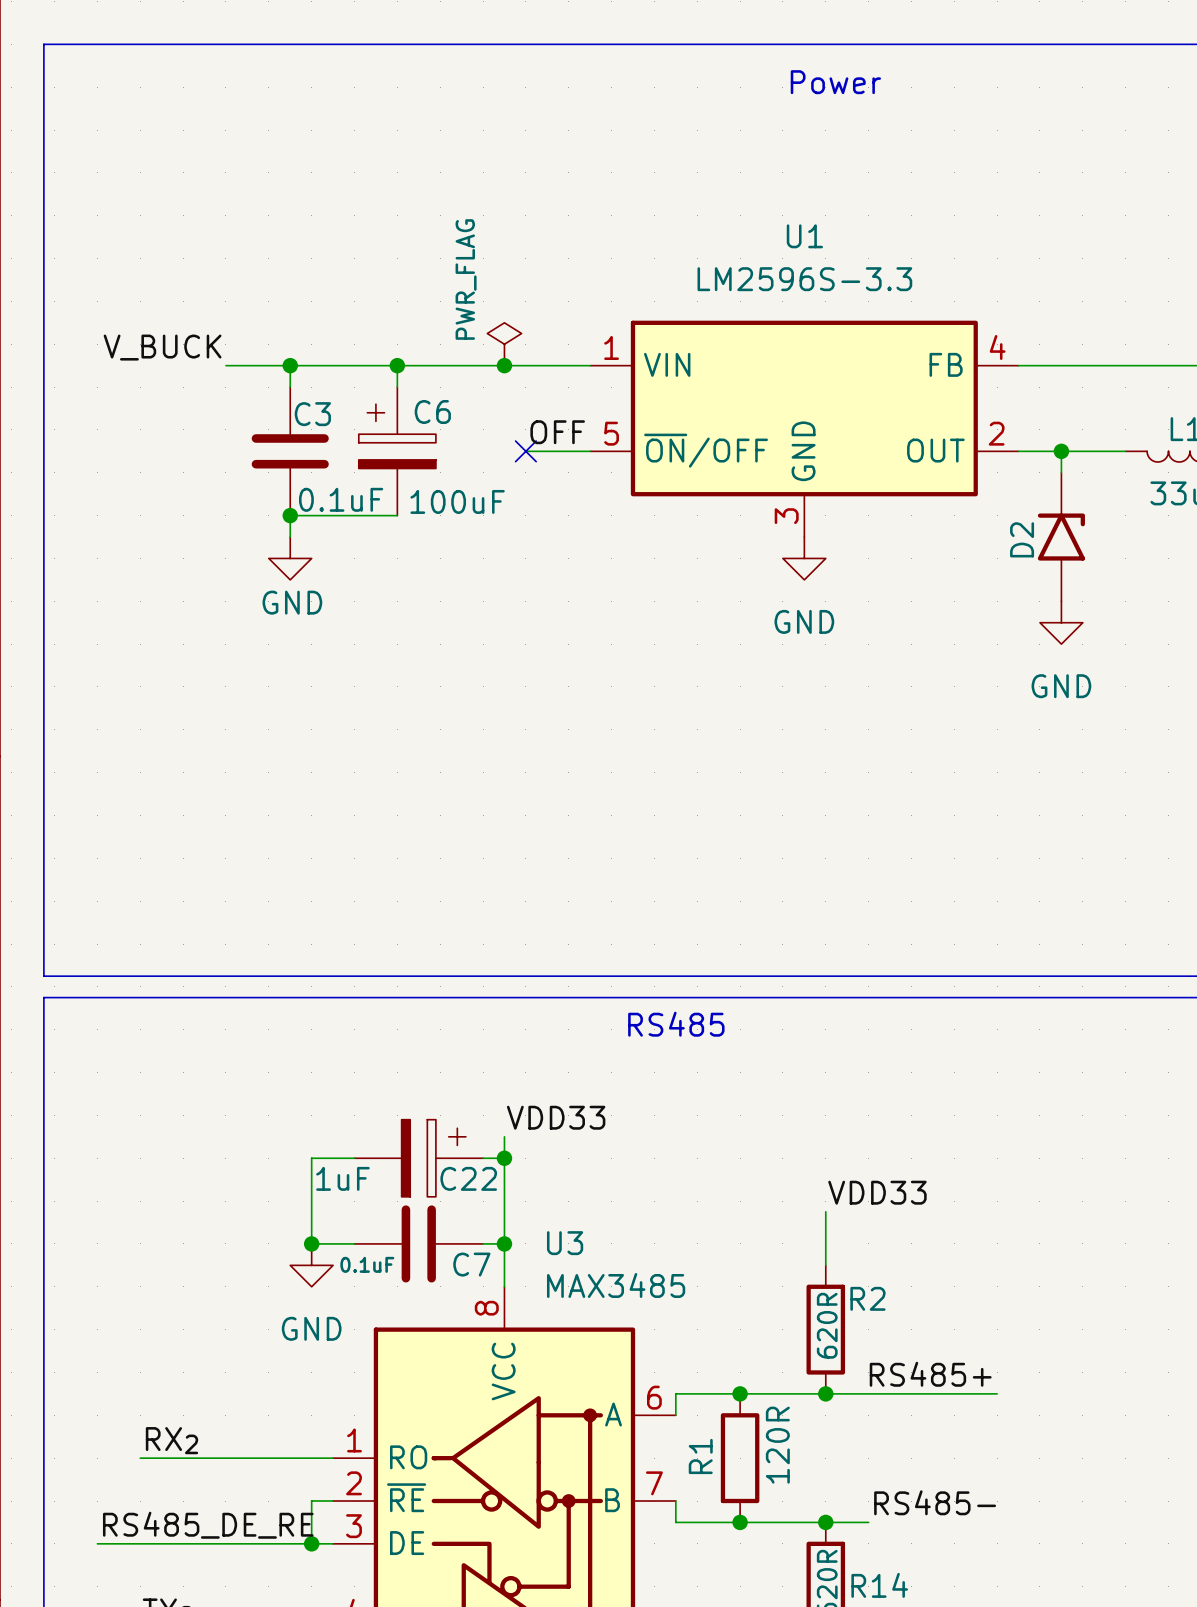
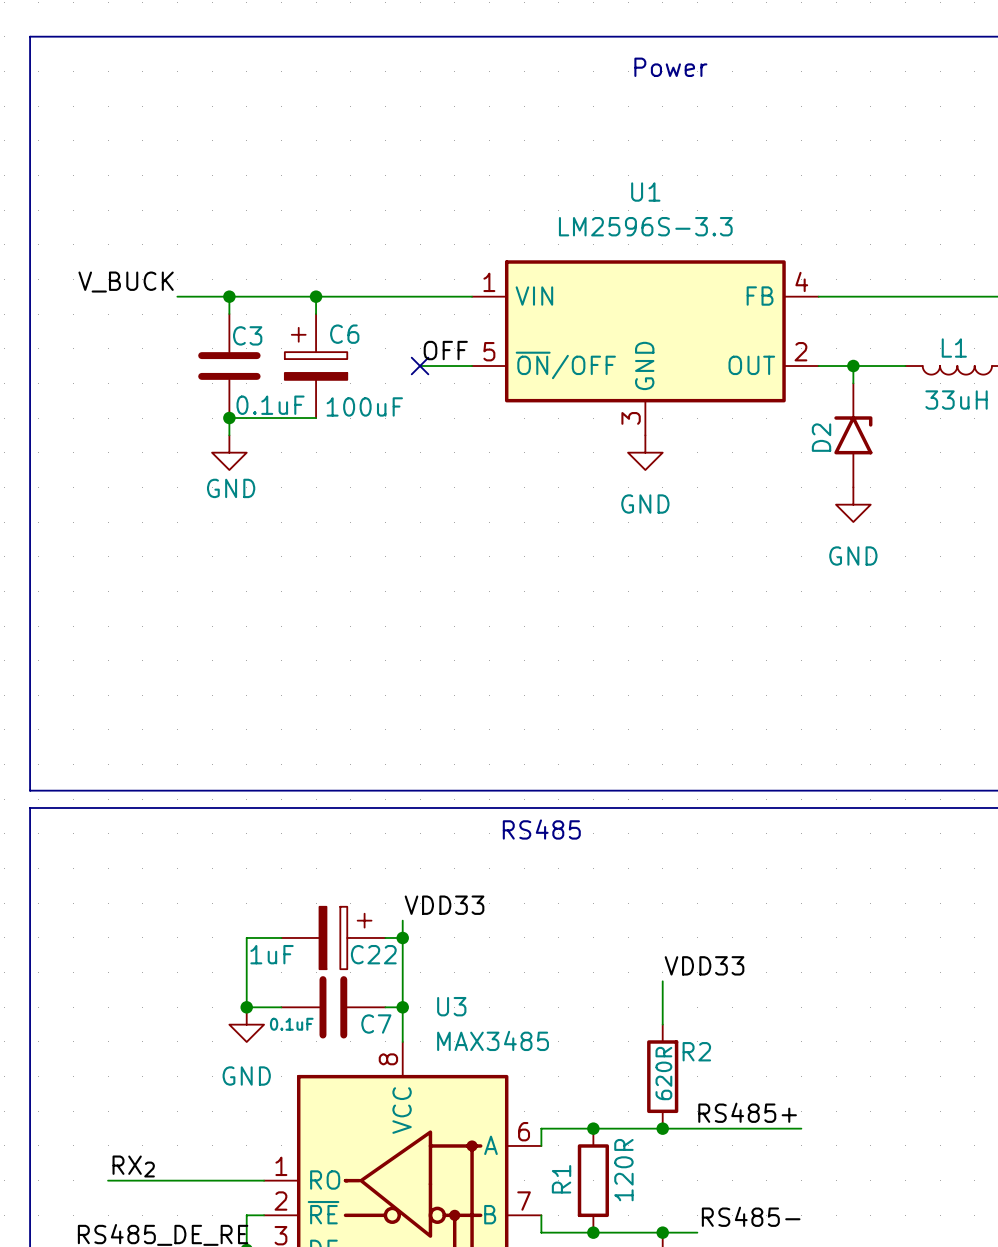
power symbol: PWR_FLAG (504, 344) -> none
junction: (504, 365) -> none

